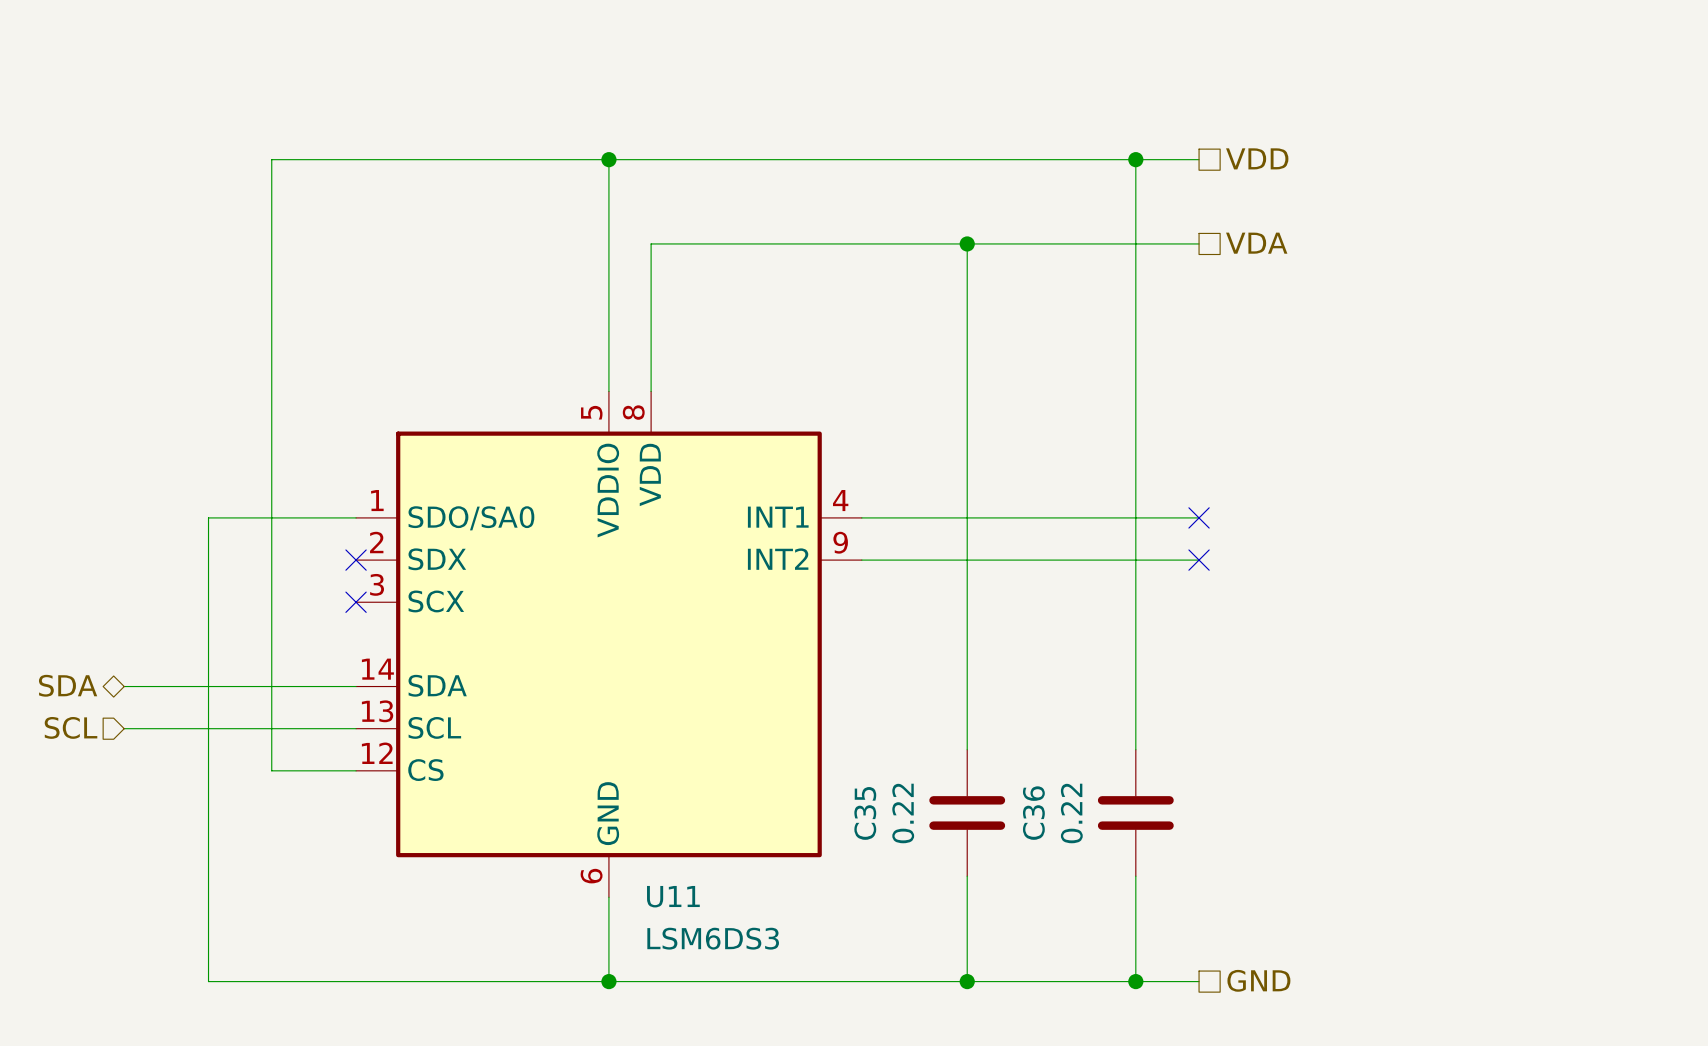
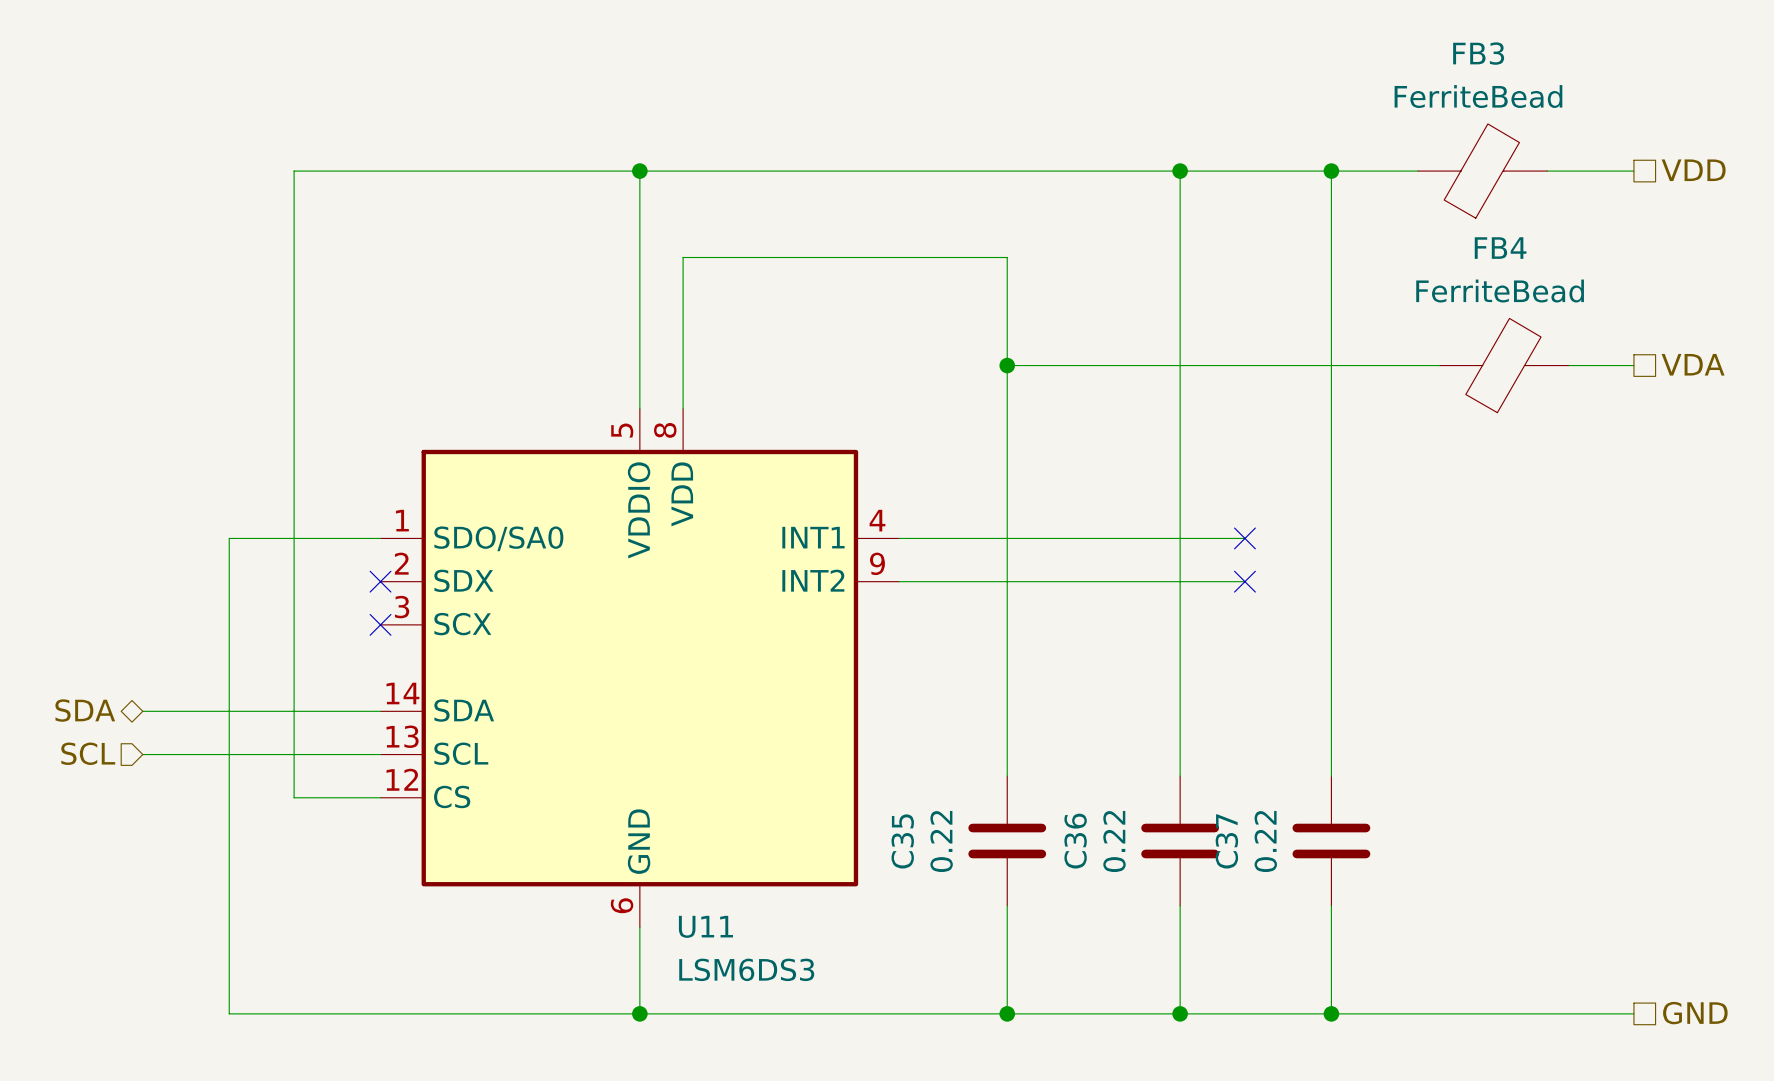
hierarchical label position: VDD (1257, 158) -> VDD (1693, 170)
wire: none -> (1244, 171) (1417, 171)
wire: none -> (1331, 171) (1331, 776)
junction: none -> (1331, 171)
FB3: none -> FerriteBead (1482, 171)
wire: none -> (1547, 171) (1633, 171)
wire: (967, 243) (1199, 243) -> none
junction: (967, 243) -> none
hierarchical label position: VDA (1256, 243) -> VDA (1693, 364)
wire: none -> (1007, 365) (1439, 365)
junction: none -> (1007, 365)
FB4: none -> FerriteBead (1504, 365)
wire: none -> (1569, 365) (1633, 365)
C37: none -> 0.22 (1331, 841)
wire: none -> (1331, 905) (1331, 1013)
hierarchical label position: GND (1258, 980) -> GND (1695, 1013)
wire: none -> (1244, 1013) (1633, 1013)
junction: none -> (1331, 1013)

